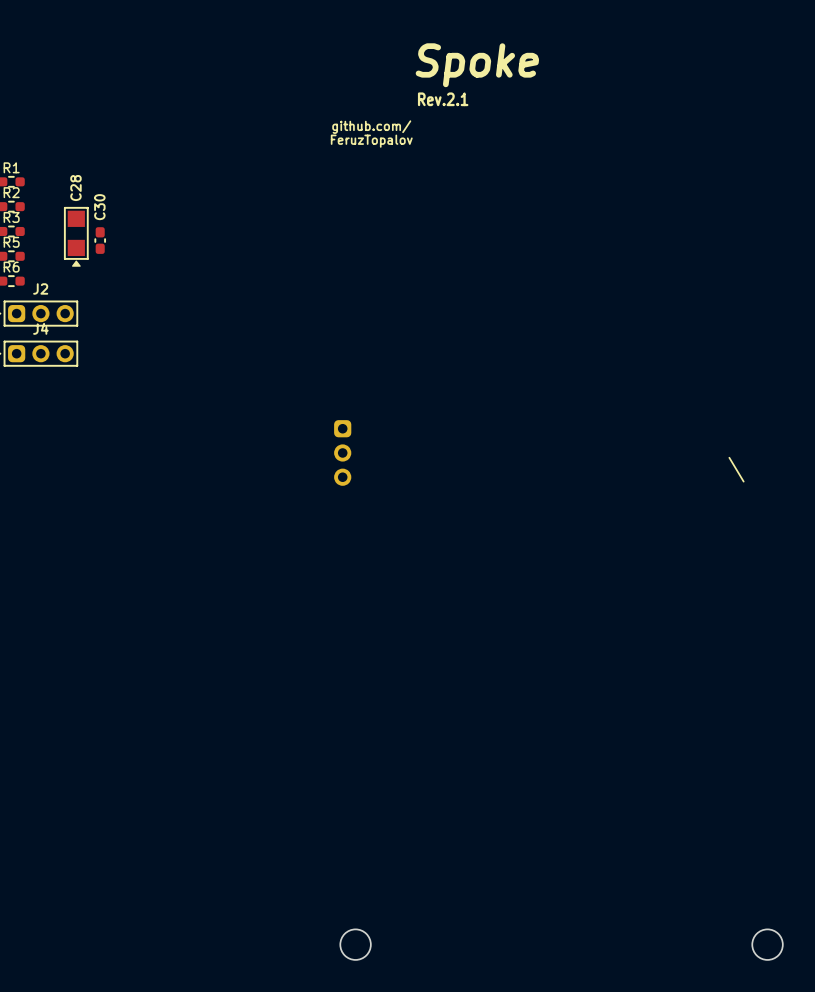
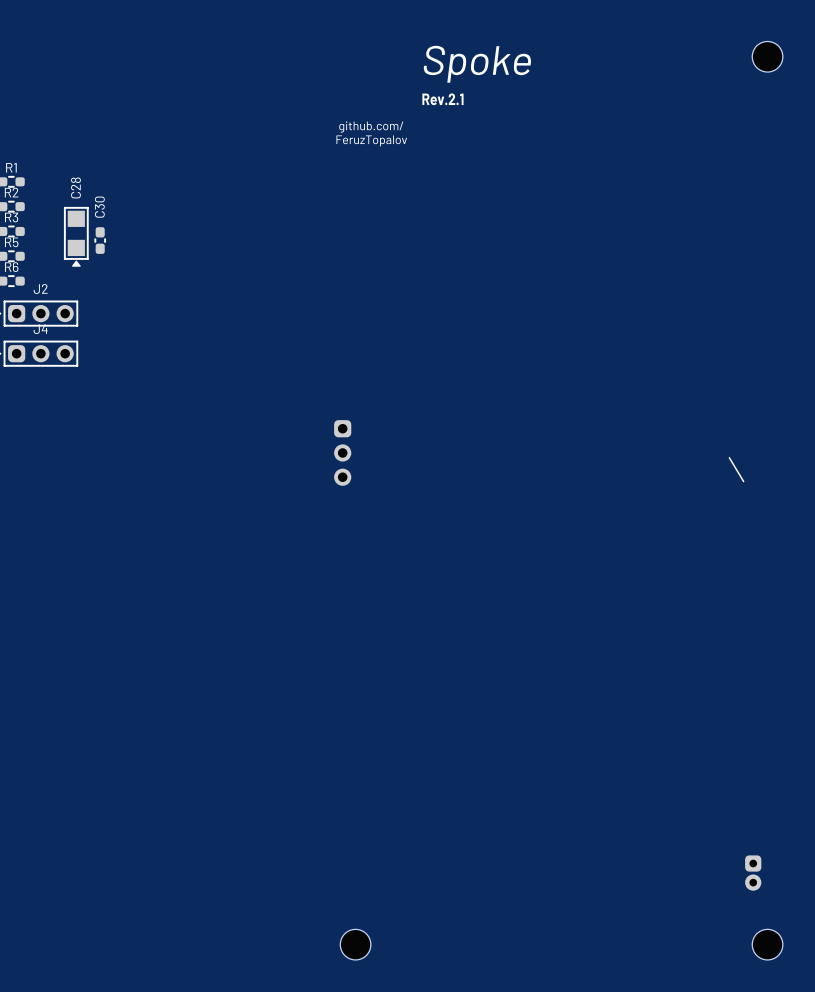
part: none -> (767, 56)
part: none -> (753, 873)

